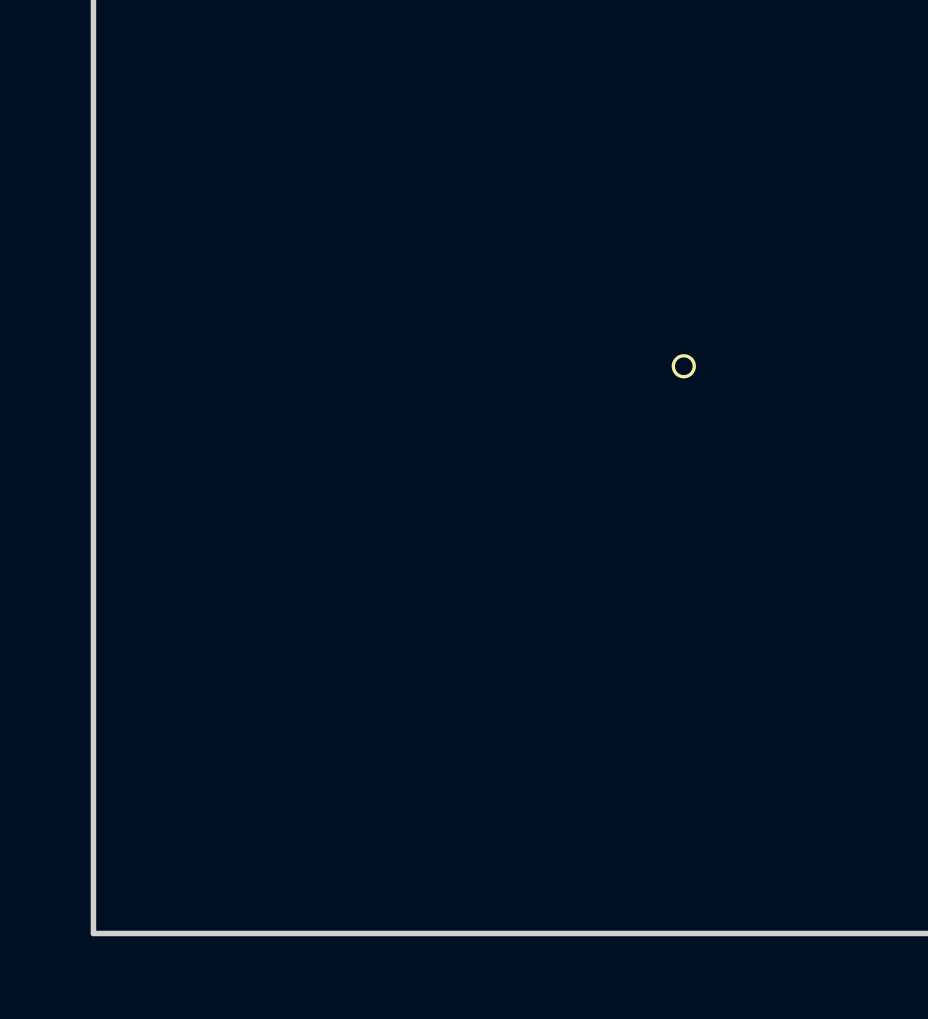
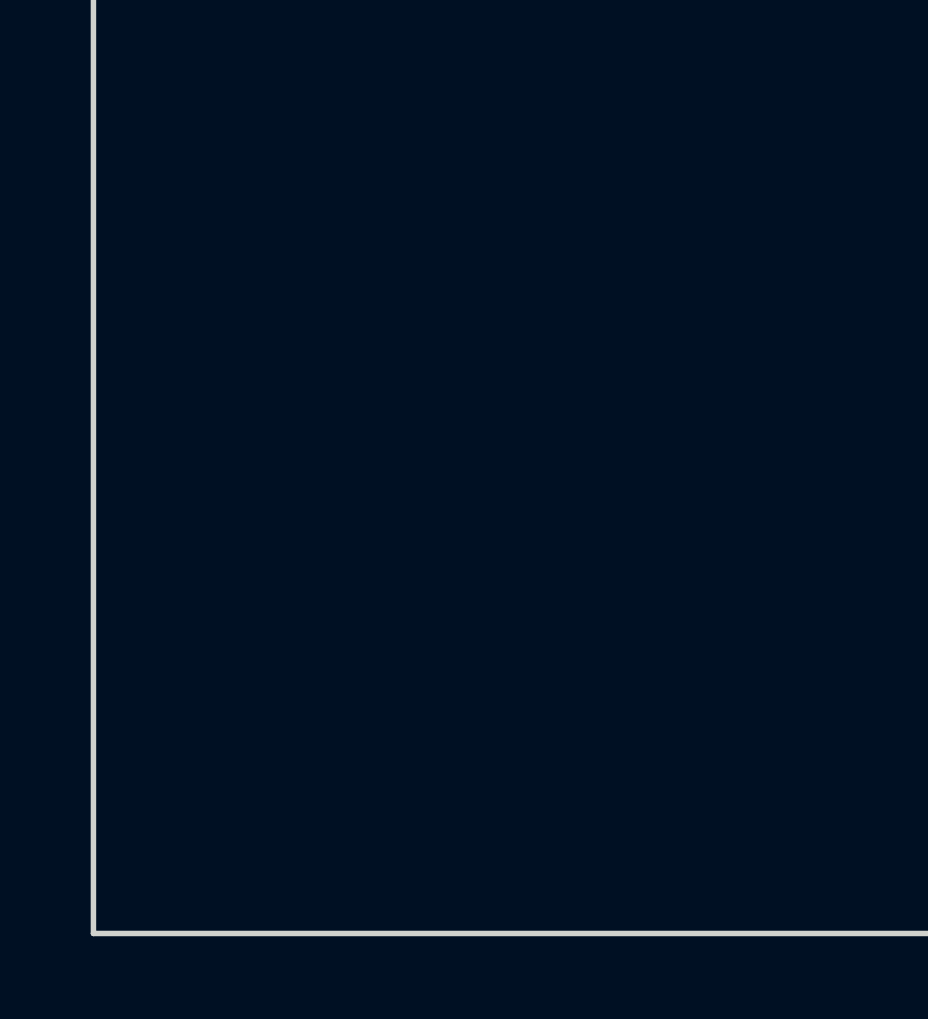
part: (683, 366) -> none

